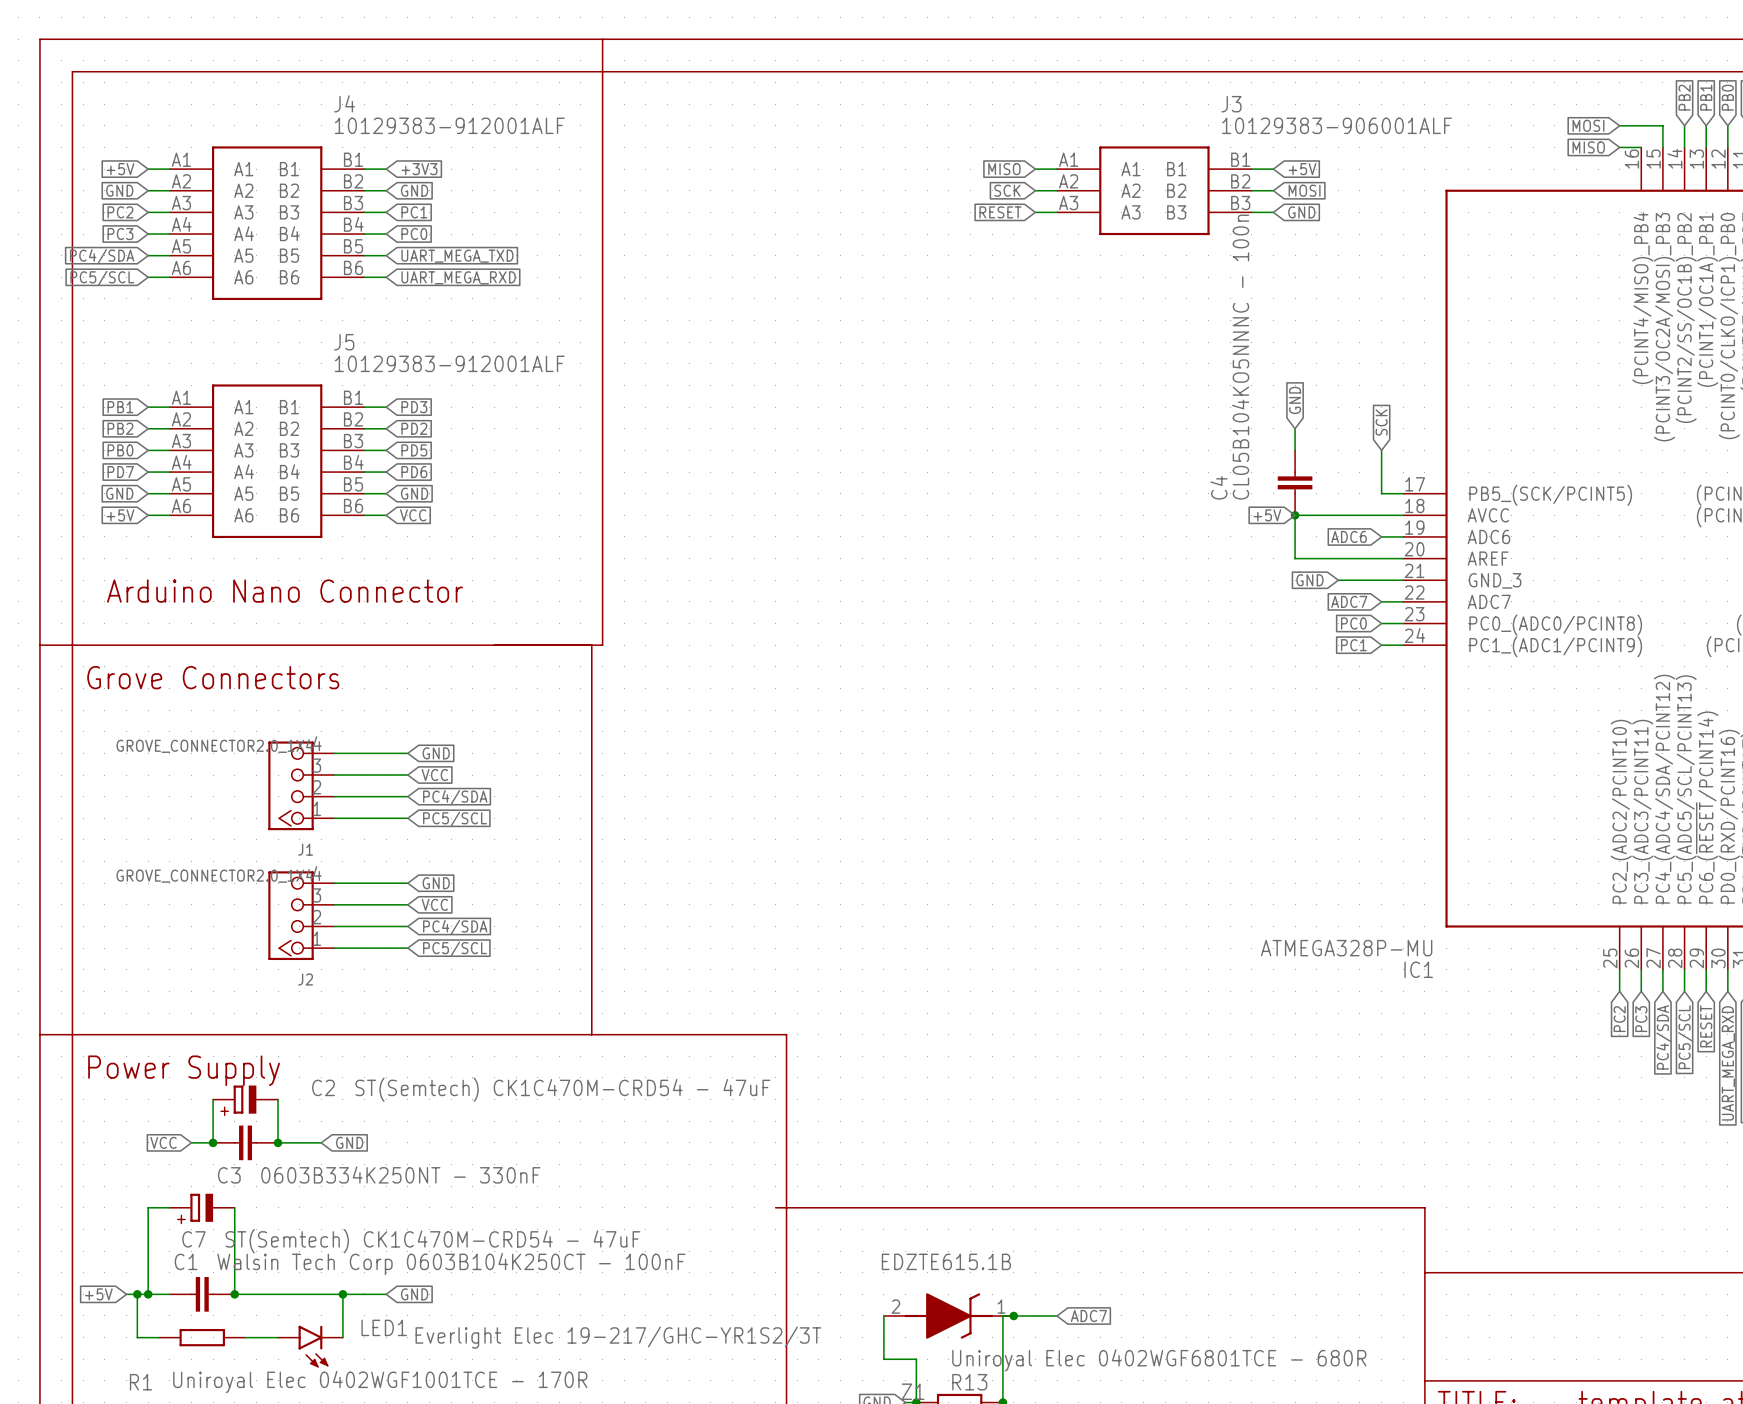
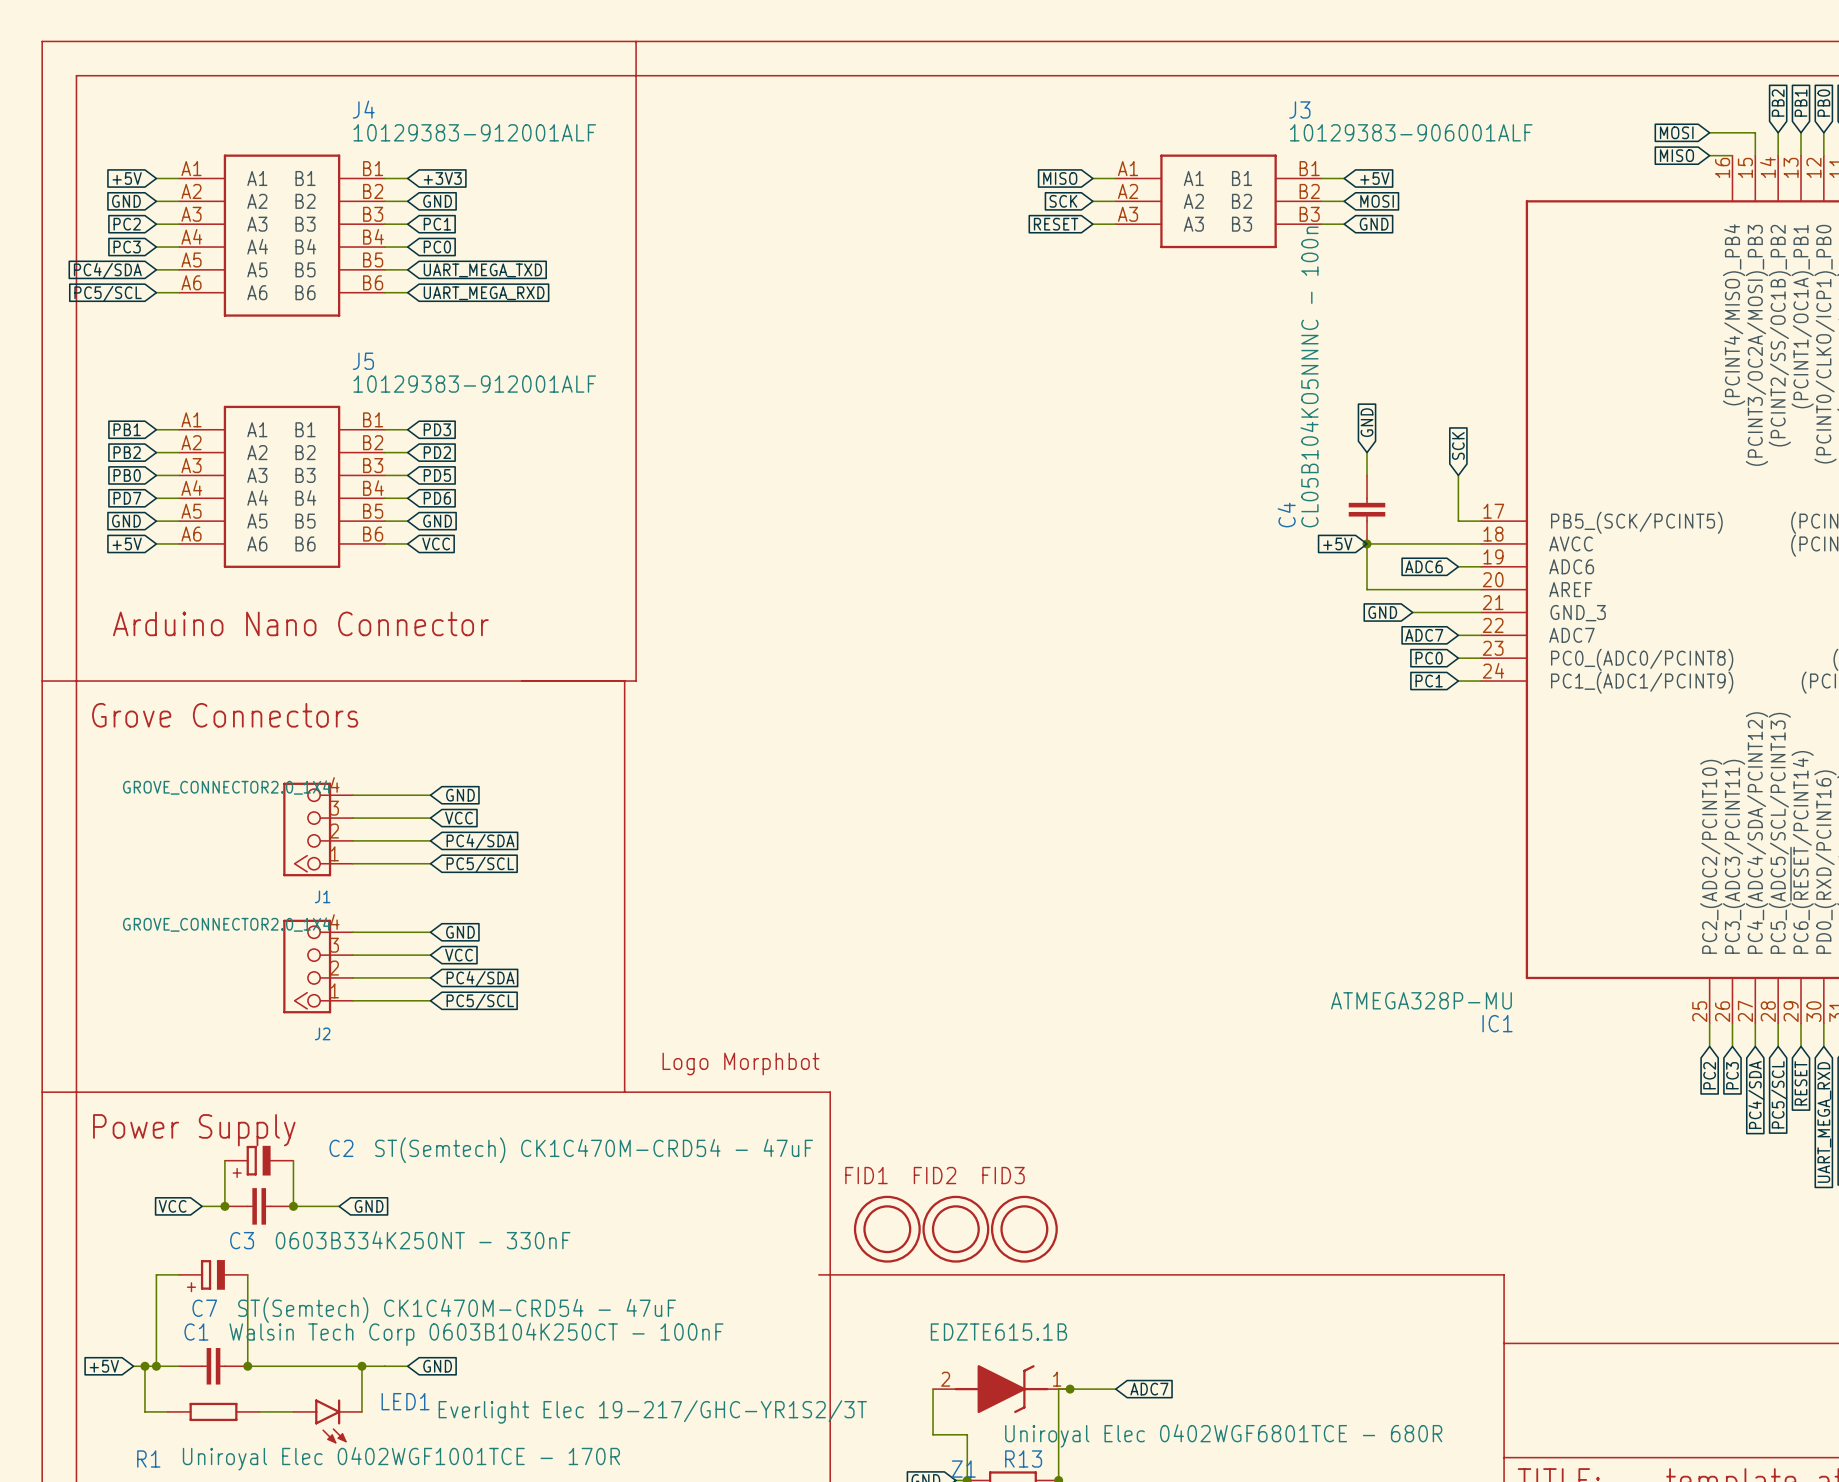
part: none -> (740, 1063)
FID1: none -> (887, 1229)
FID2: none -> (955, 1229)
FID3: none -> (1024, 1229)

